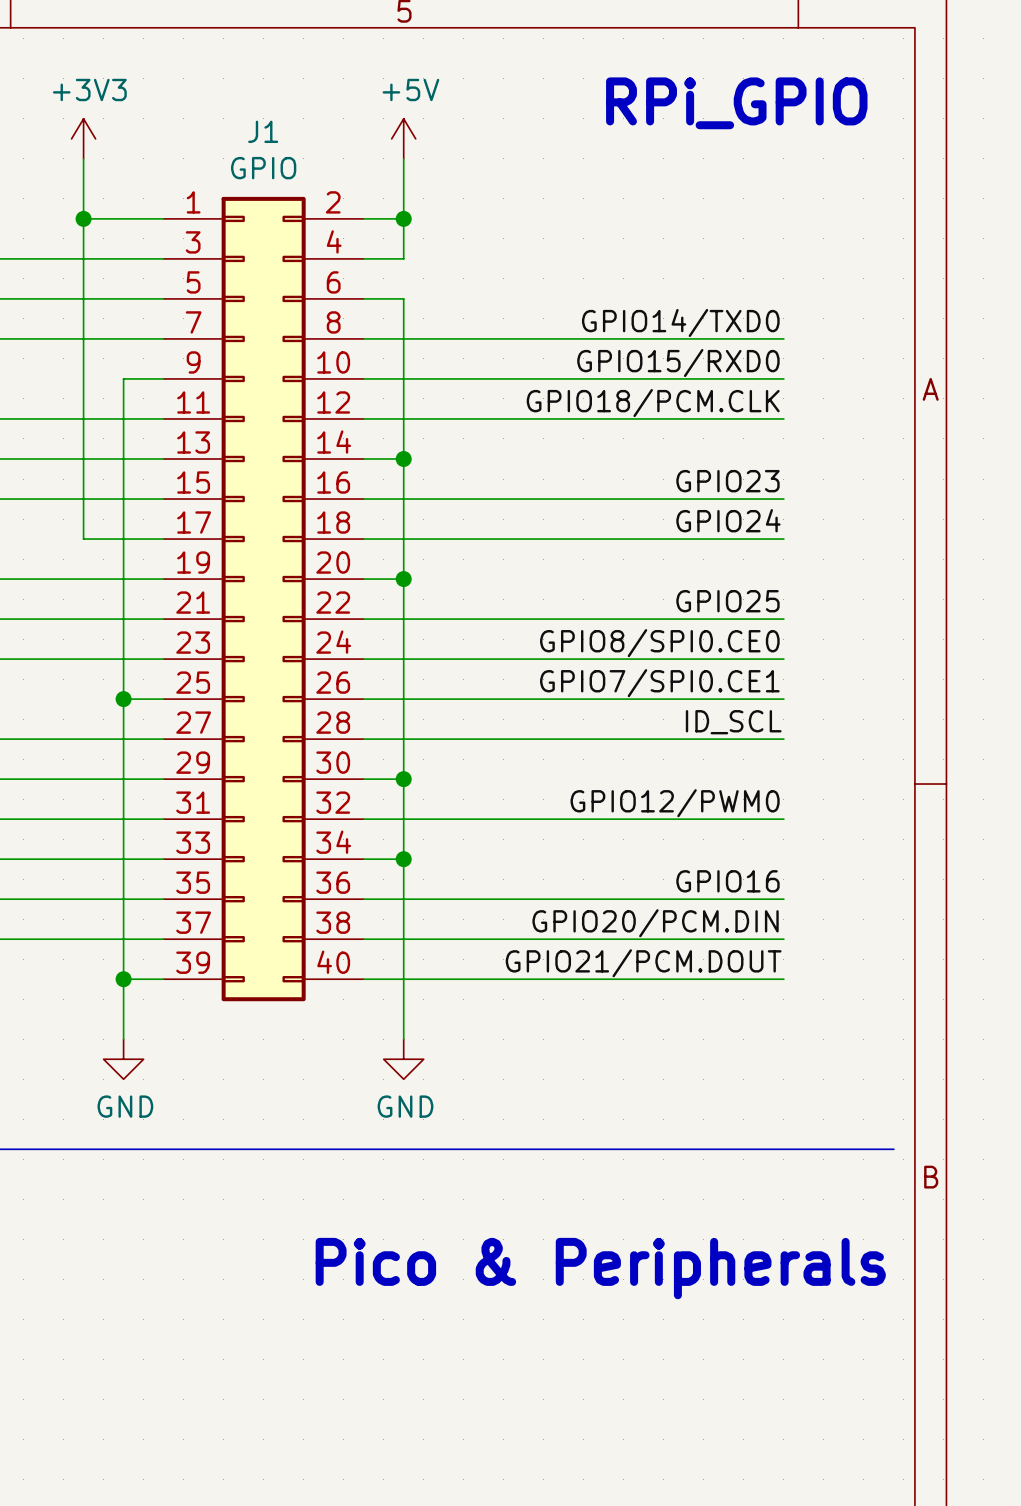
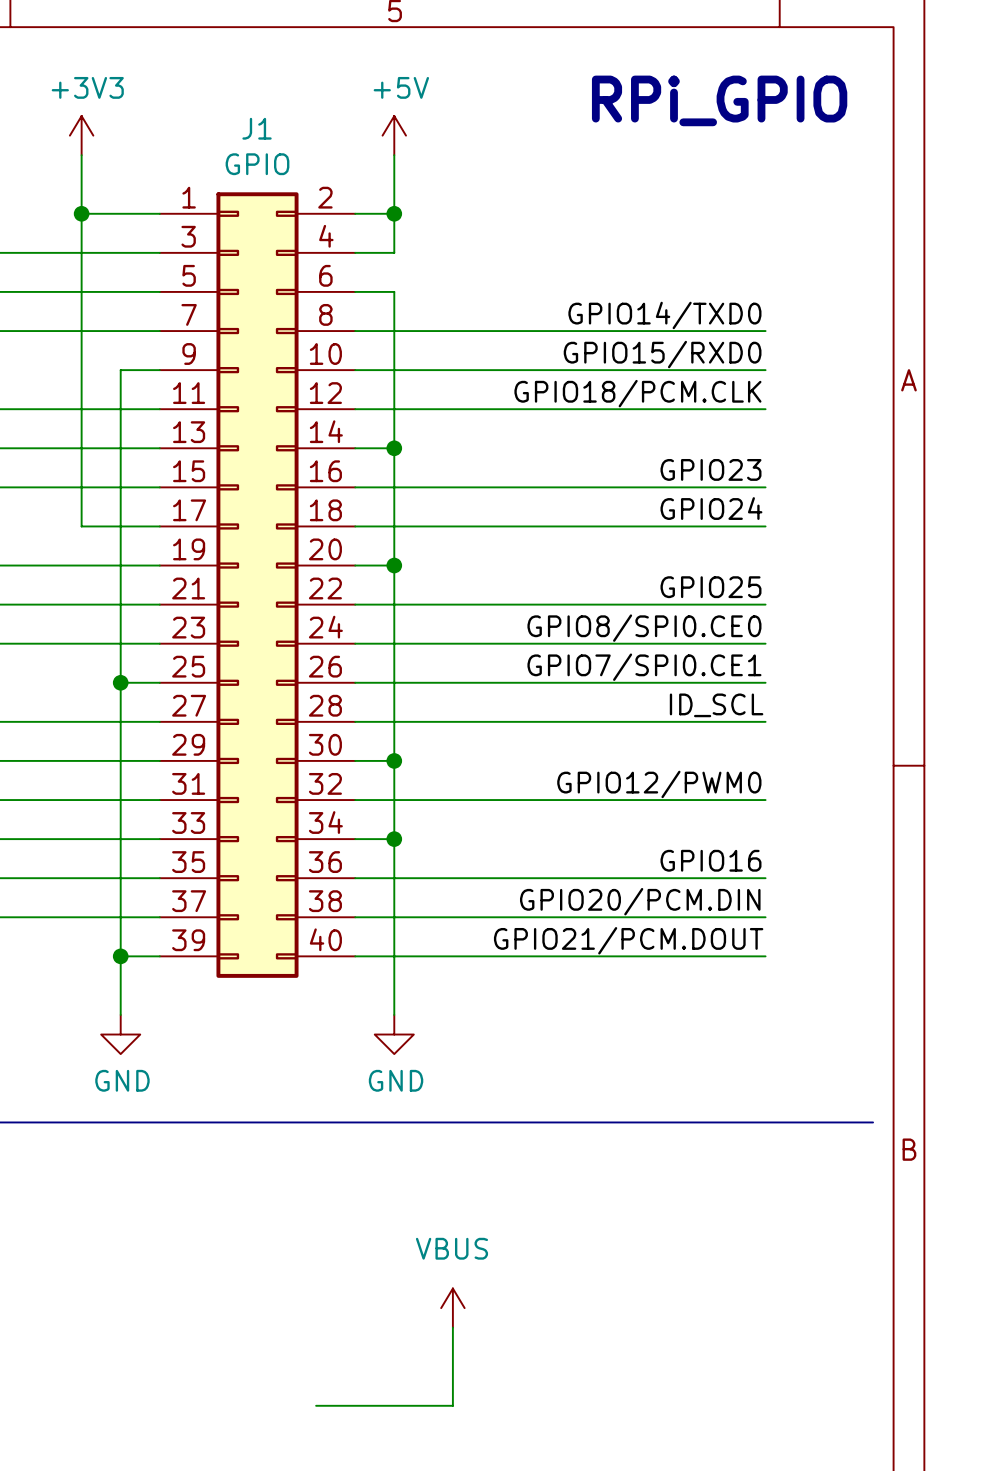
text: Pico & Peripherals (600, 1268) -> none
power symbol: none -> VBUS (452, 1308)
wire: none -> (452, 1327) (452, 1405) (316, 1405)

